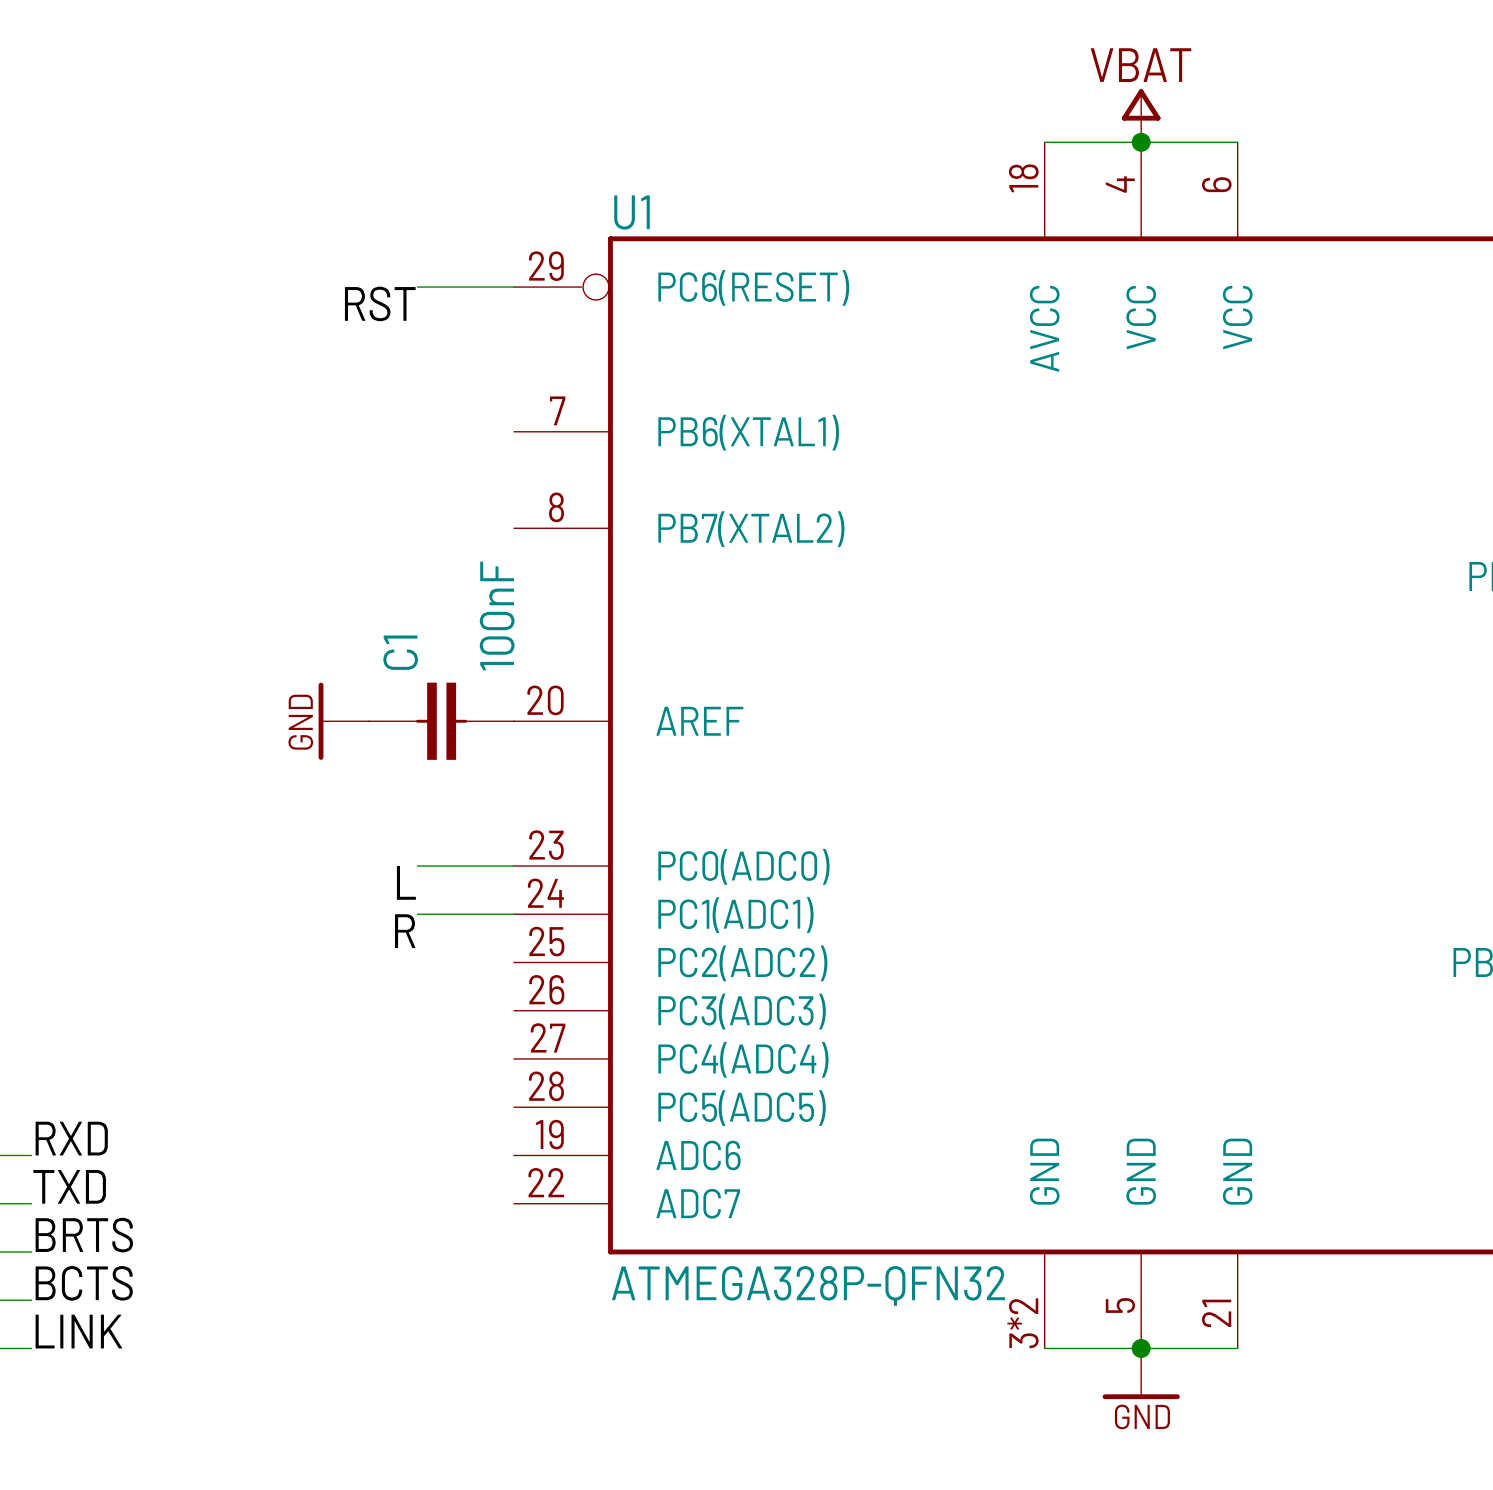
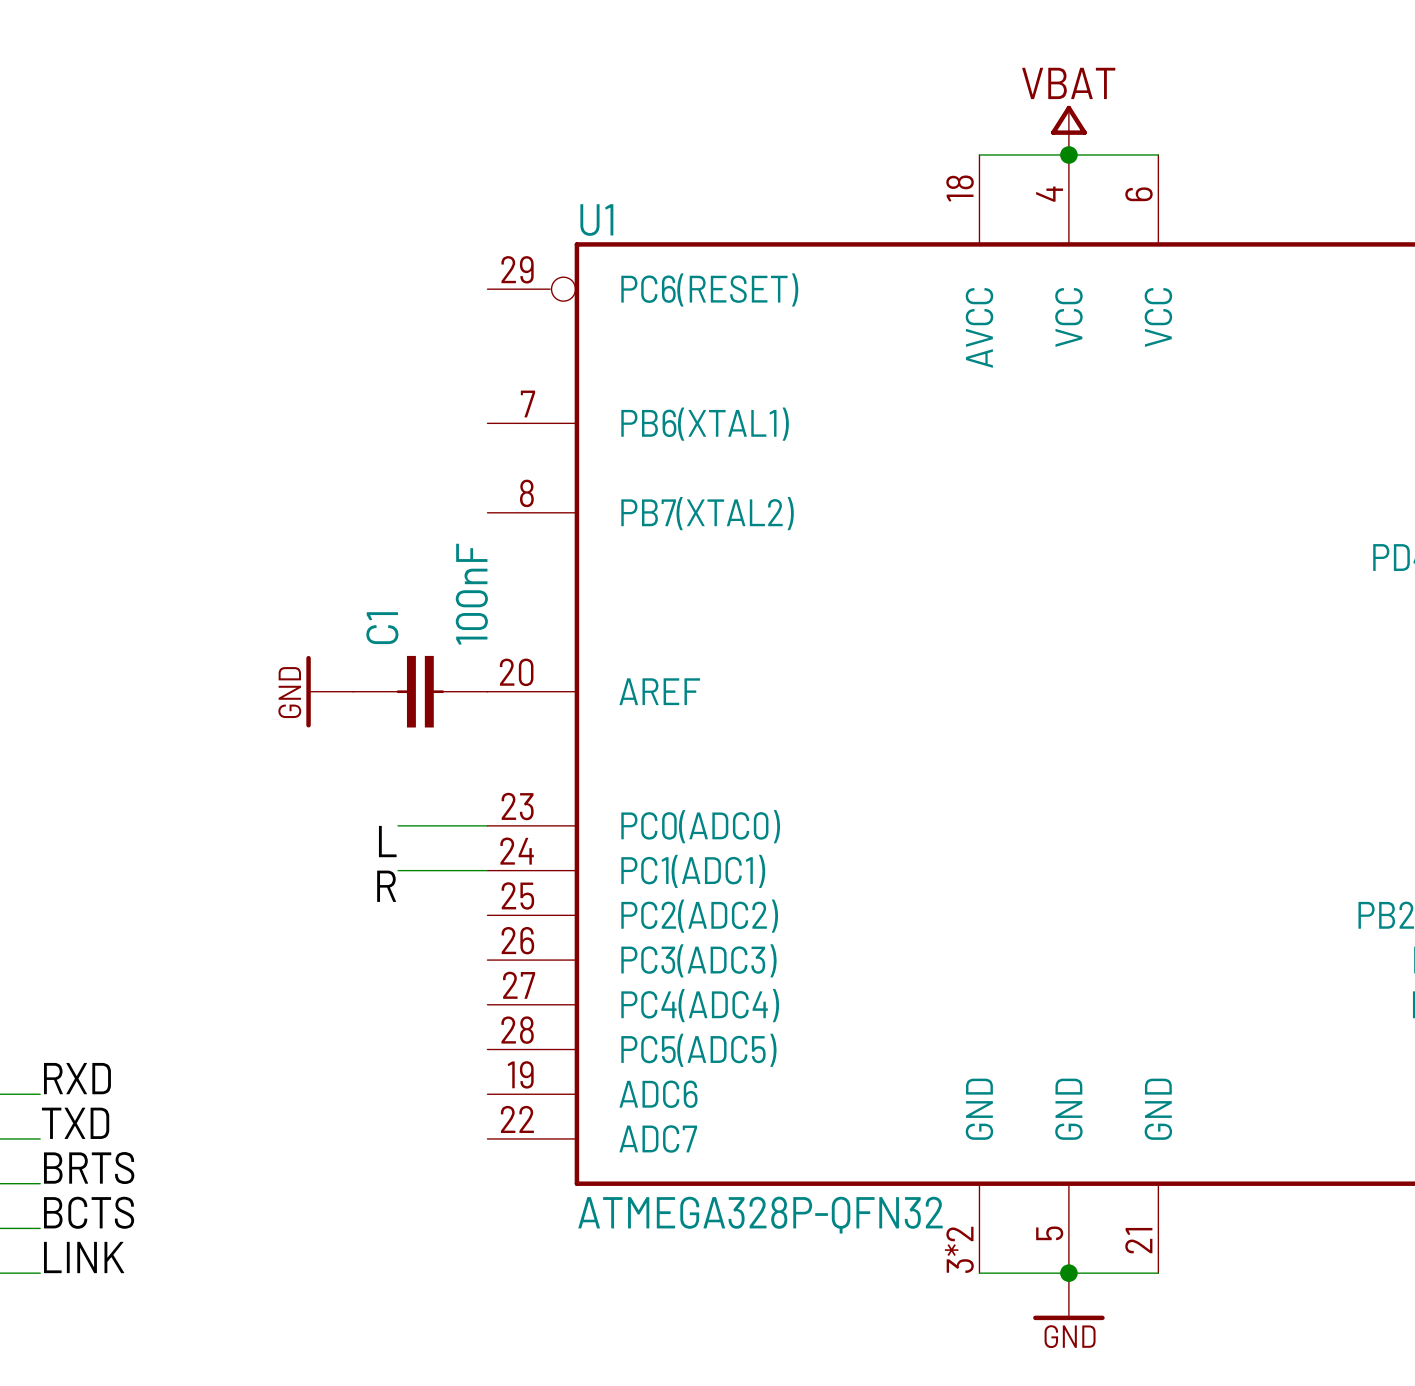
wire: (417, 287) (513, 287) -> none
label: RST (380, 303) -> none

